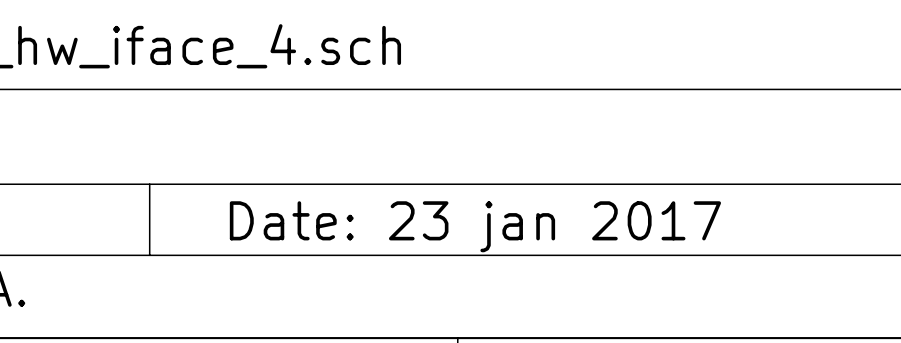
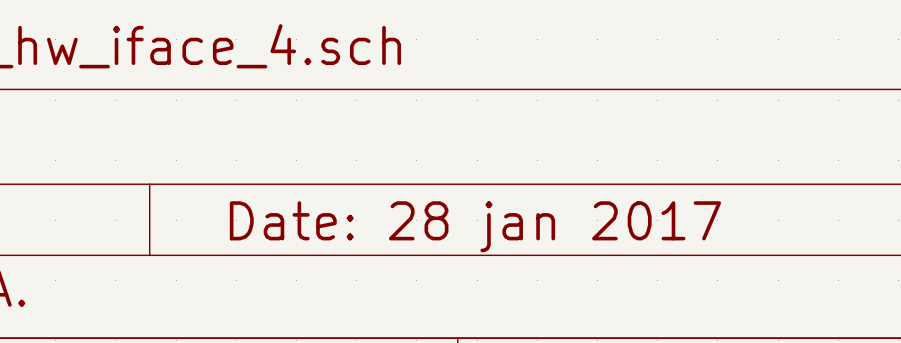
title block: Date: 23 jan 2017 (475, 226) -> Date: 28 jan 2017 (475, 226)

